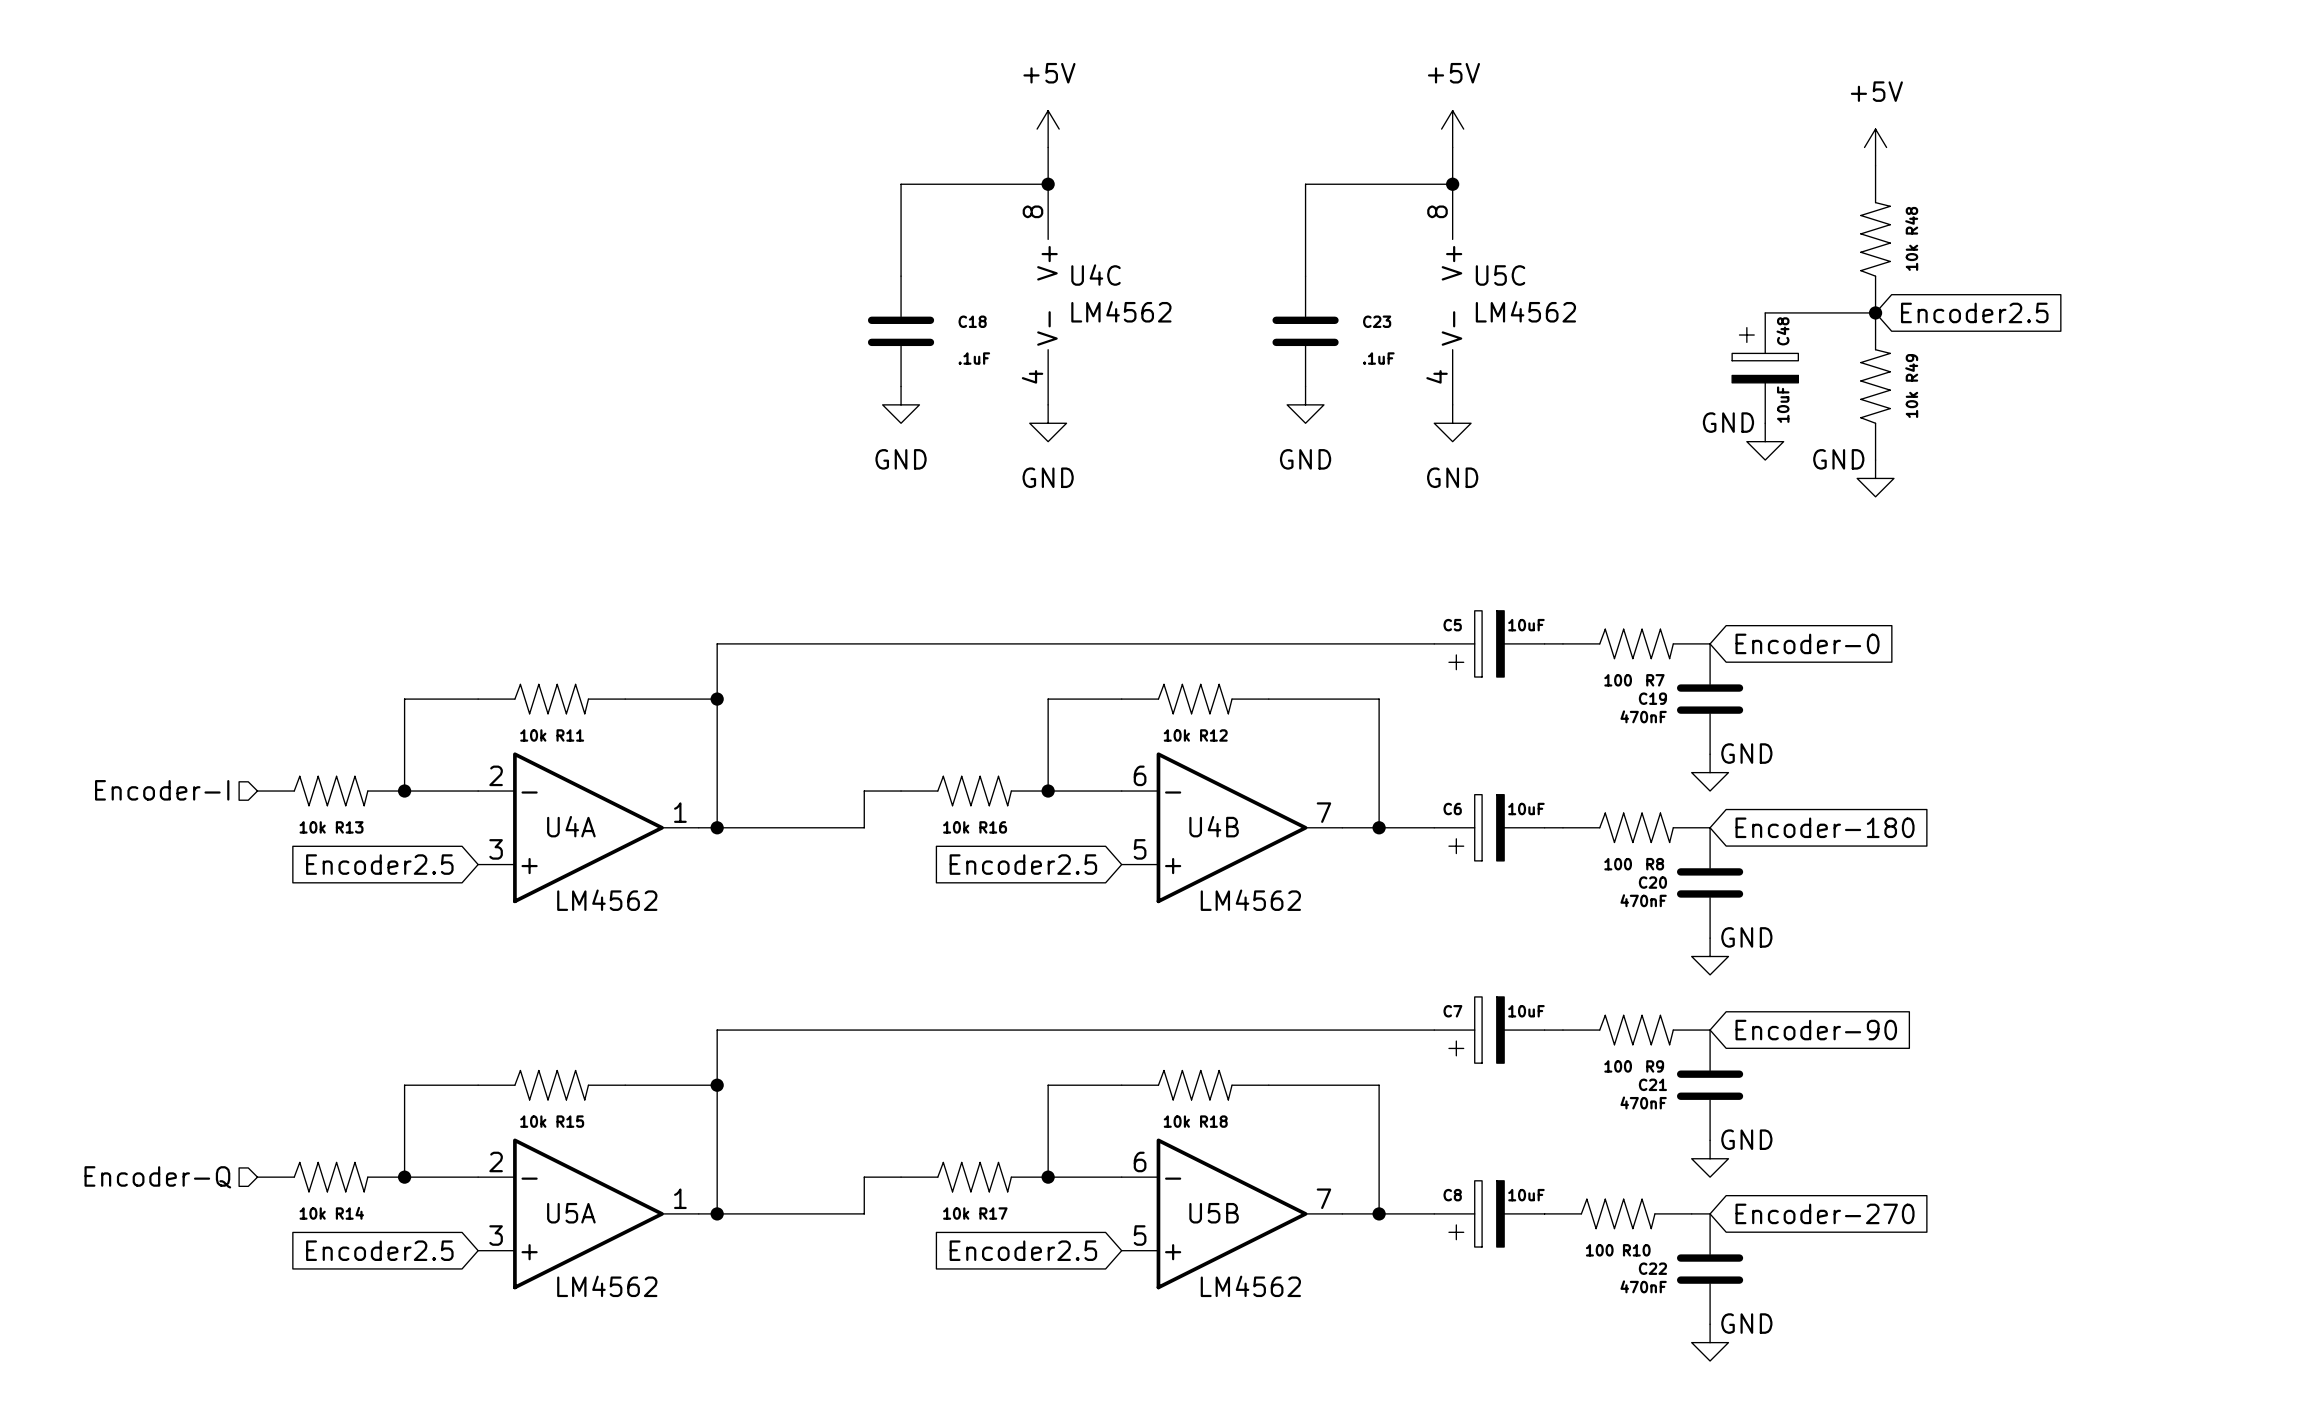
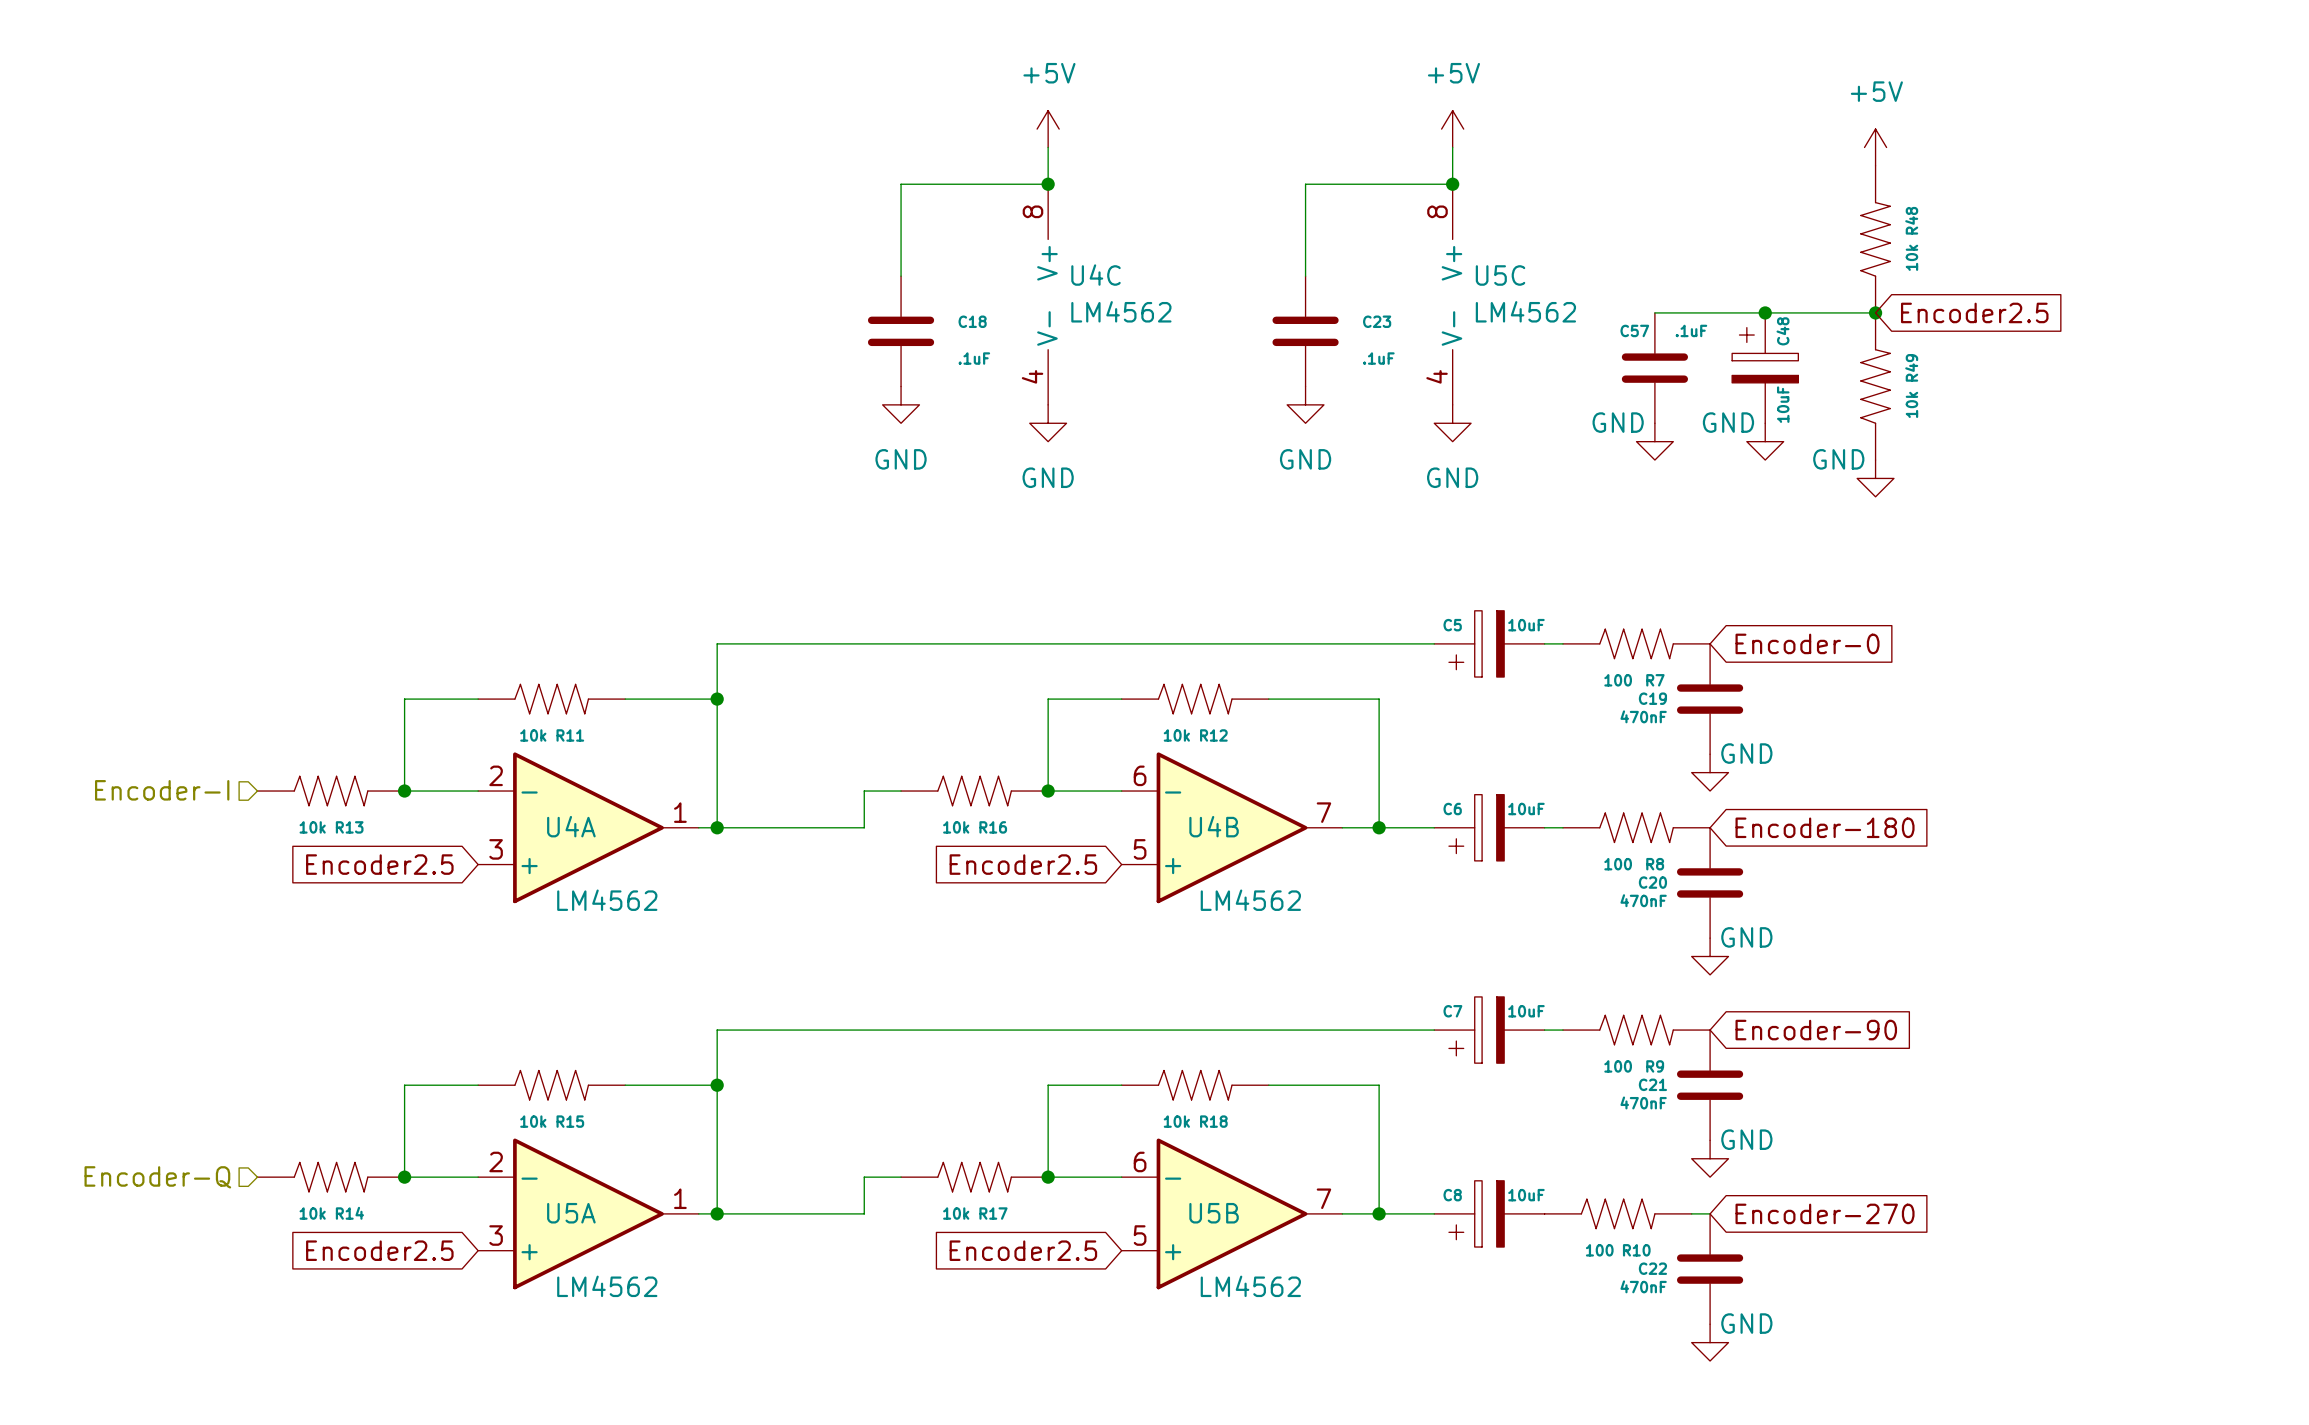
wire: none -> (1654, 312) (1765, 312)
junction: none -> (1765, 312)
C57: none -> .1uF (1654, 368)
power symbol: none -> GND (1654, 441)

